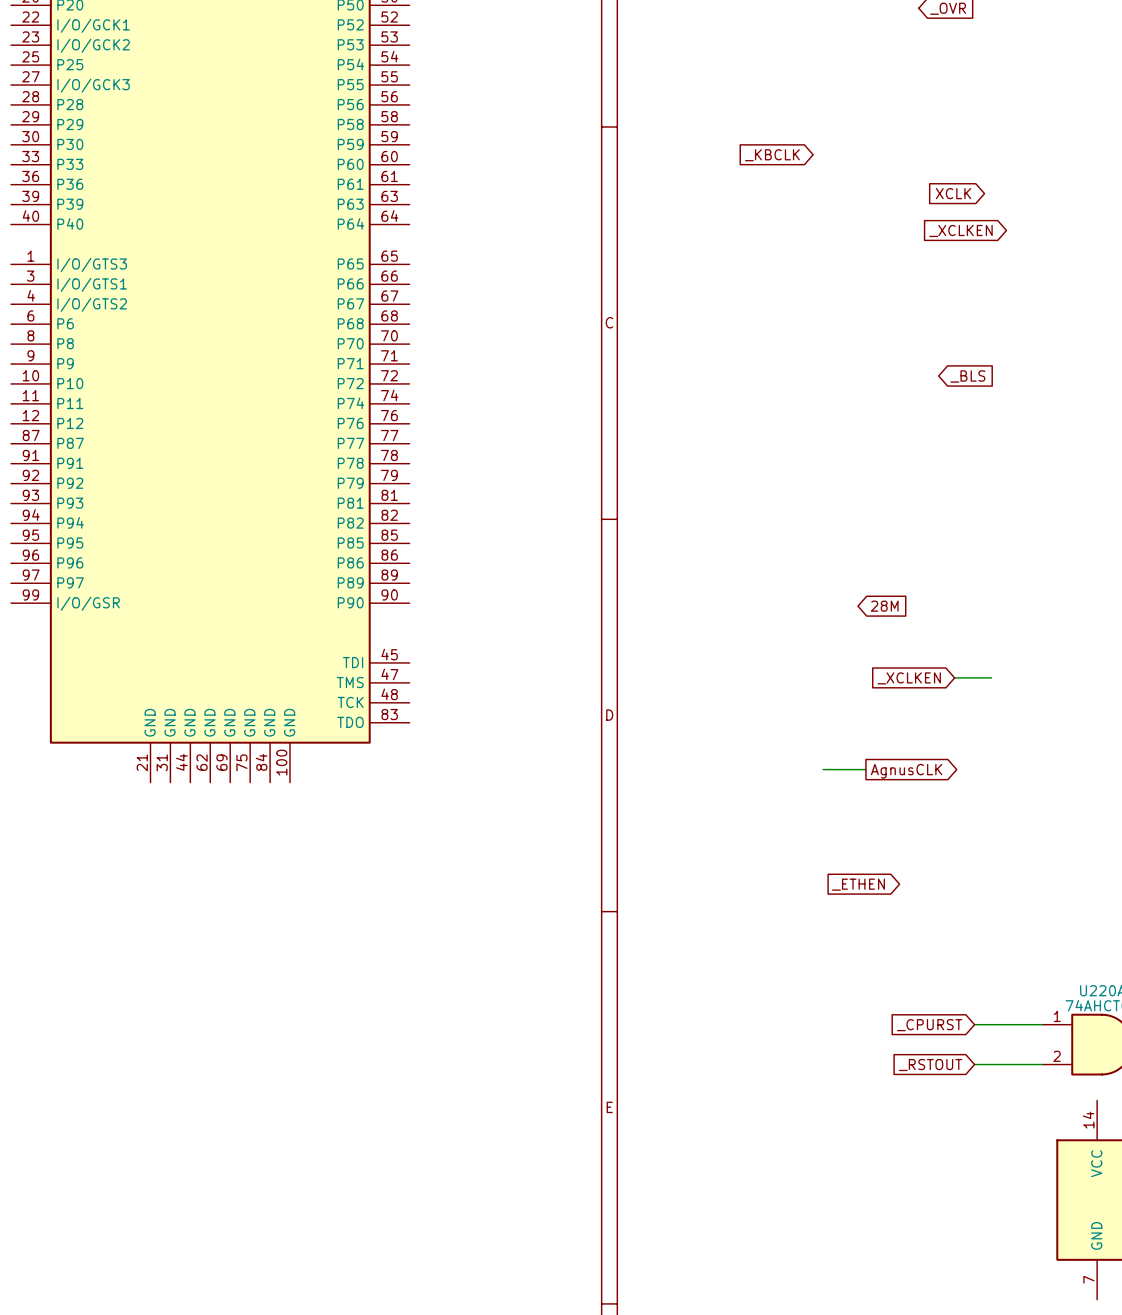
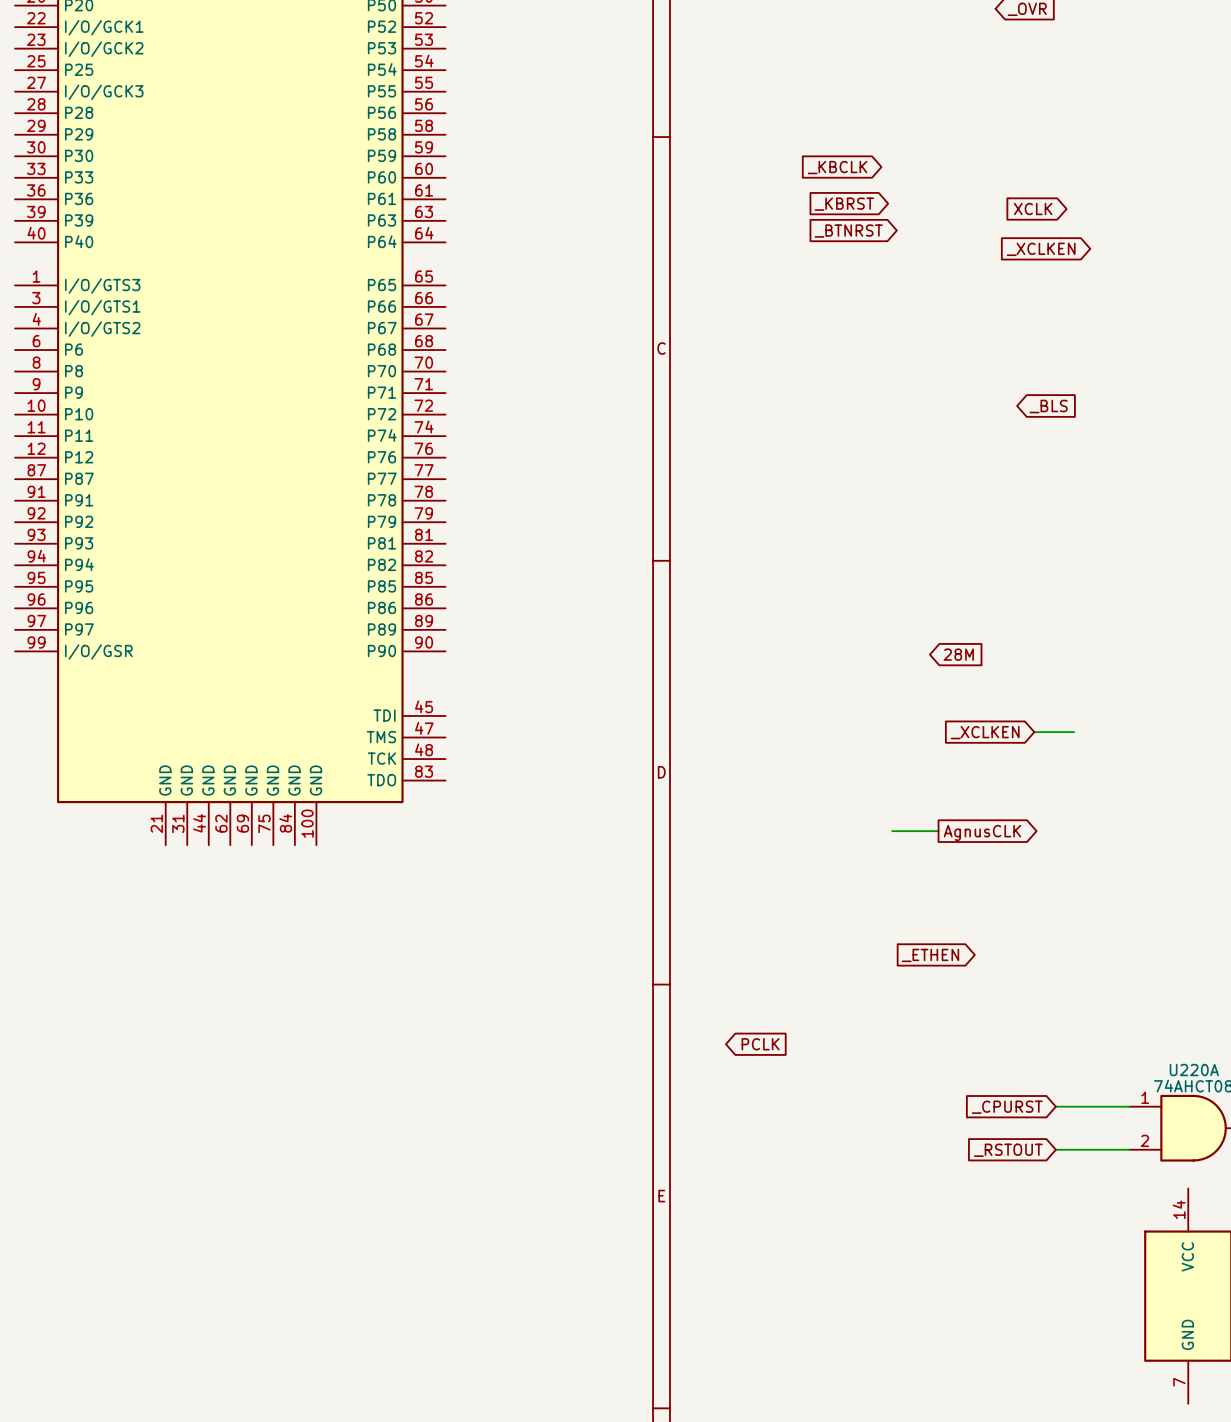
global label: none -> _KBRST (844, 204)
global label: none -> _BTNRST (848, 231)
global label: none -> PCLK (760, 1044)

